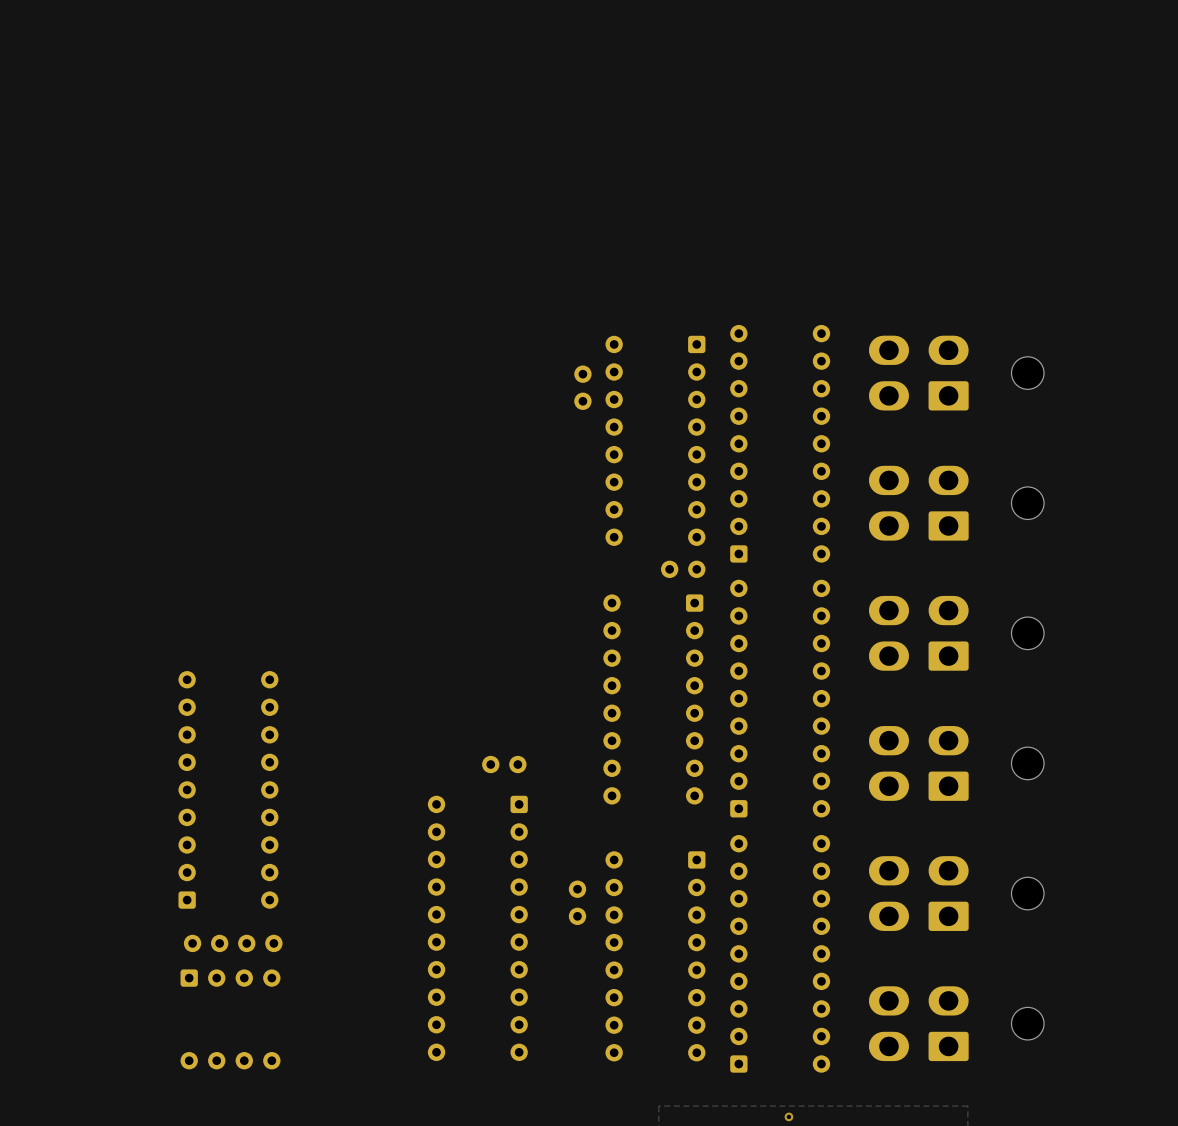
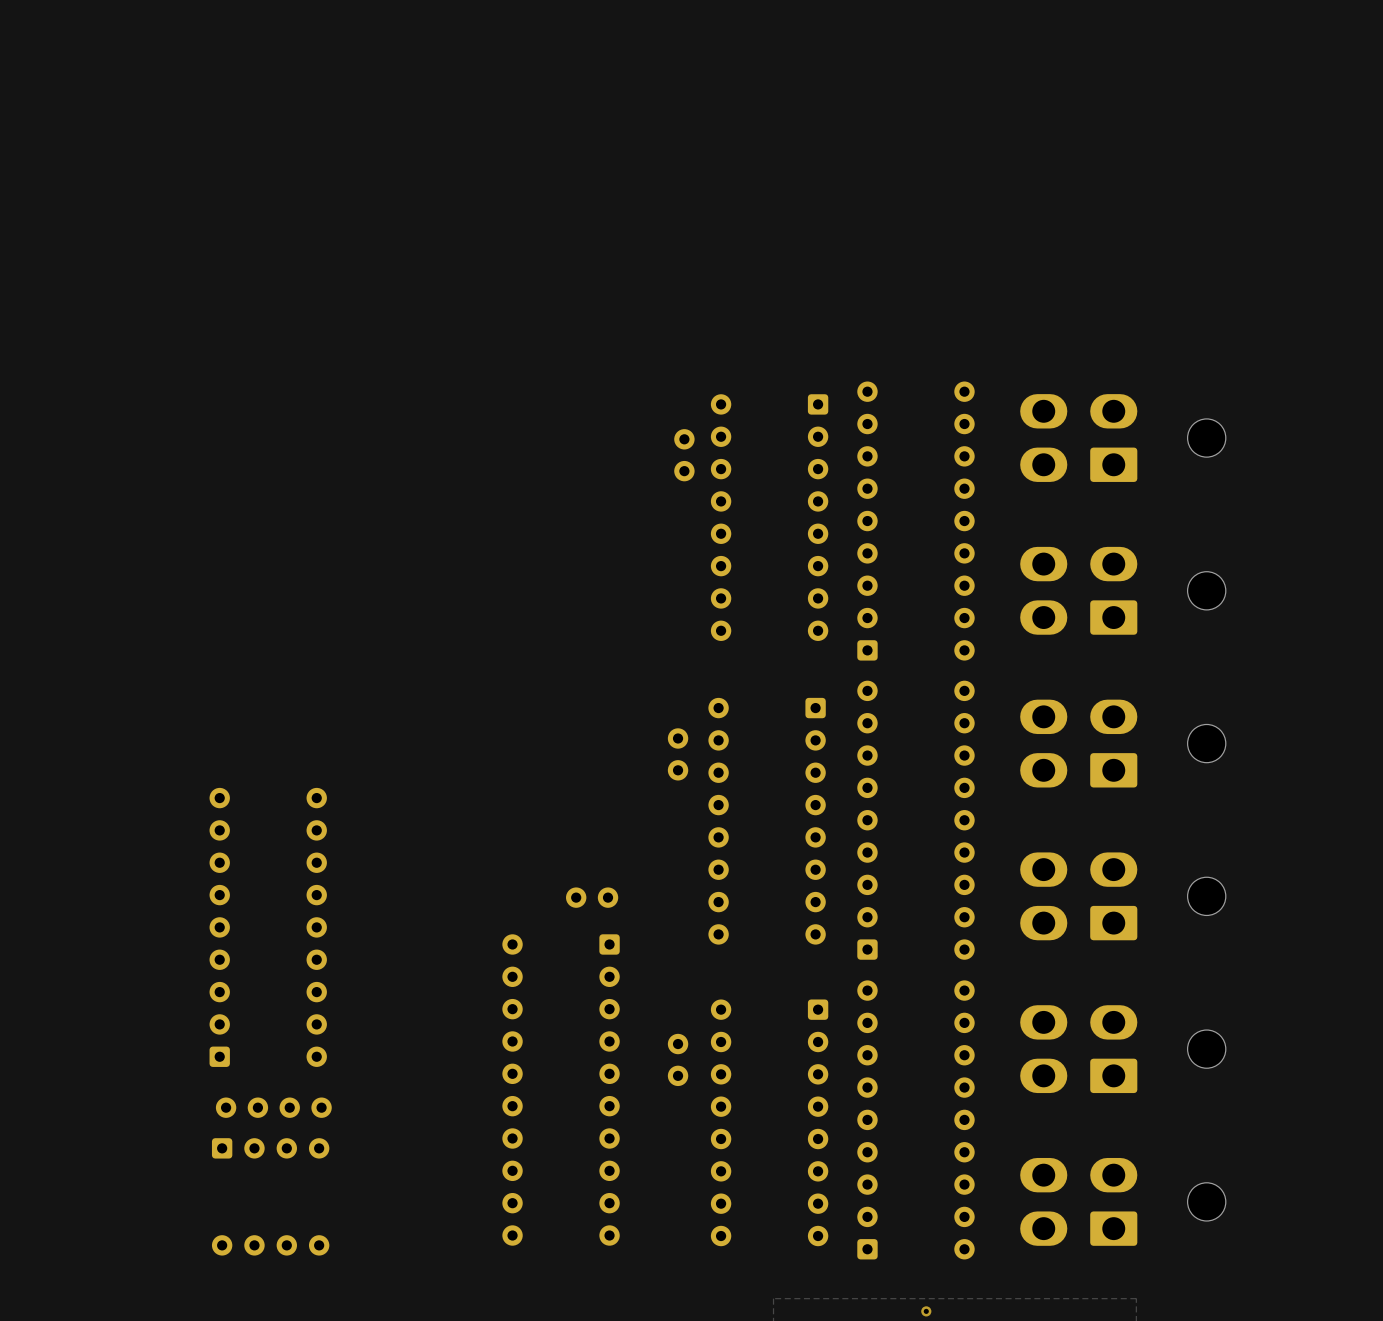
part rotation: 0° (683, 569) -> 90° clockwise (678, 754)
part position: (683, 569) -> (678, 754)

